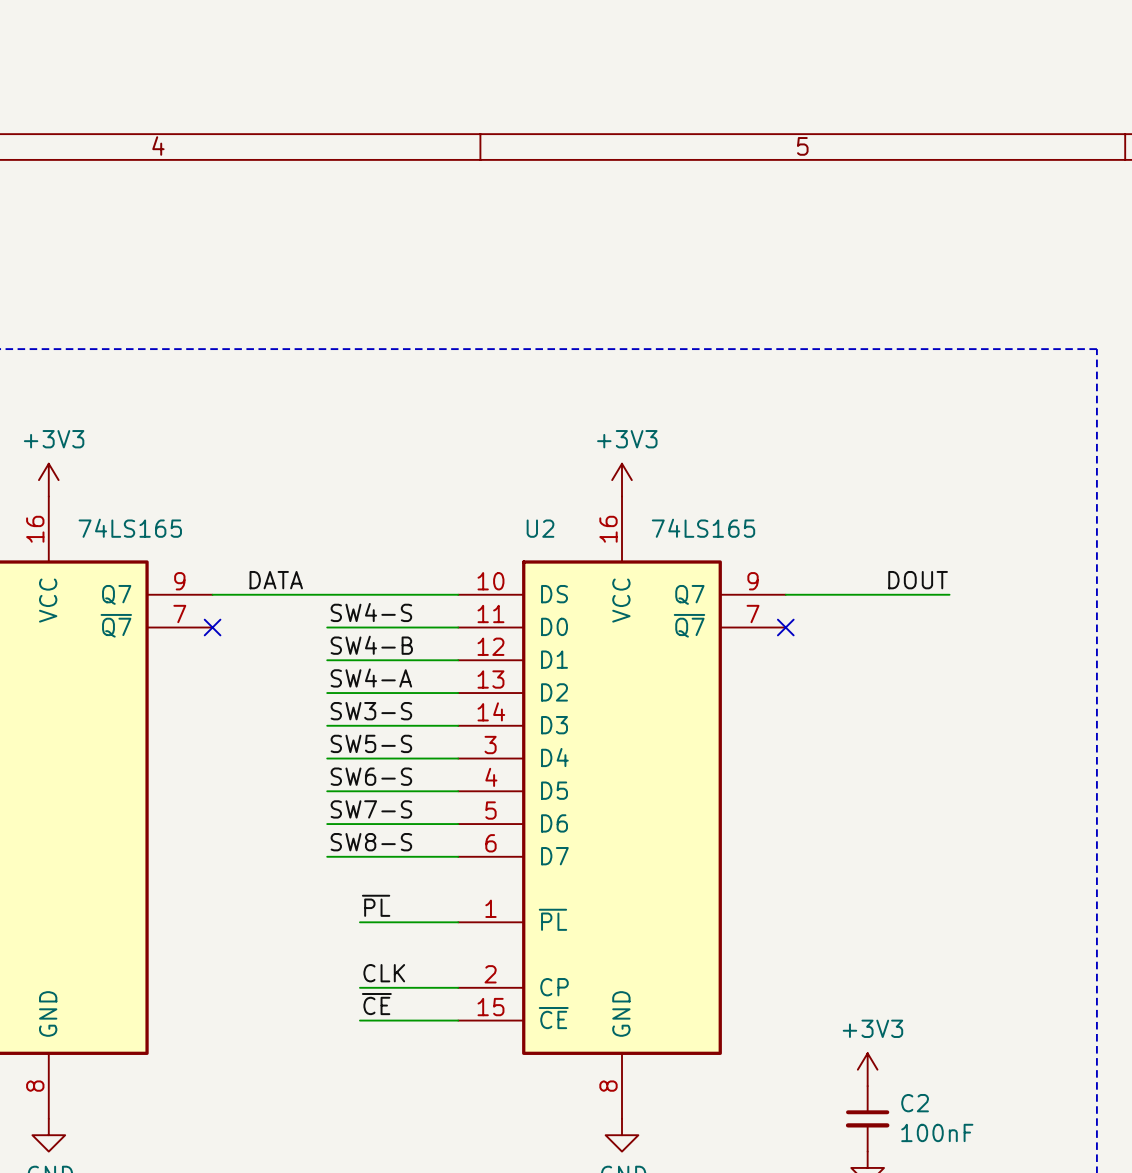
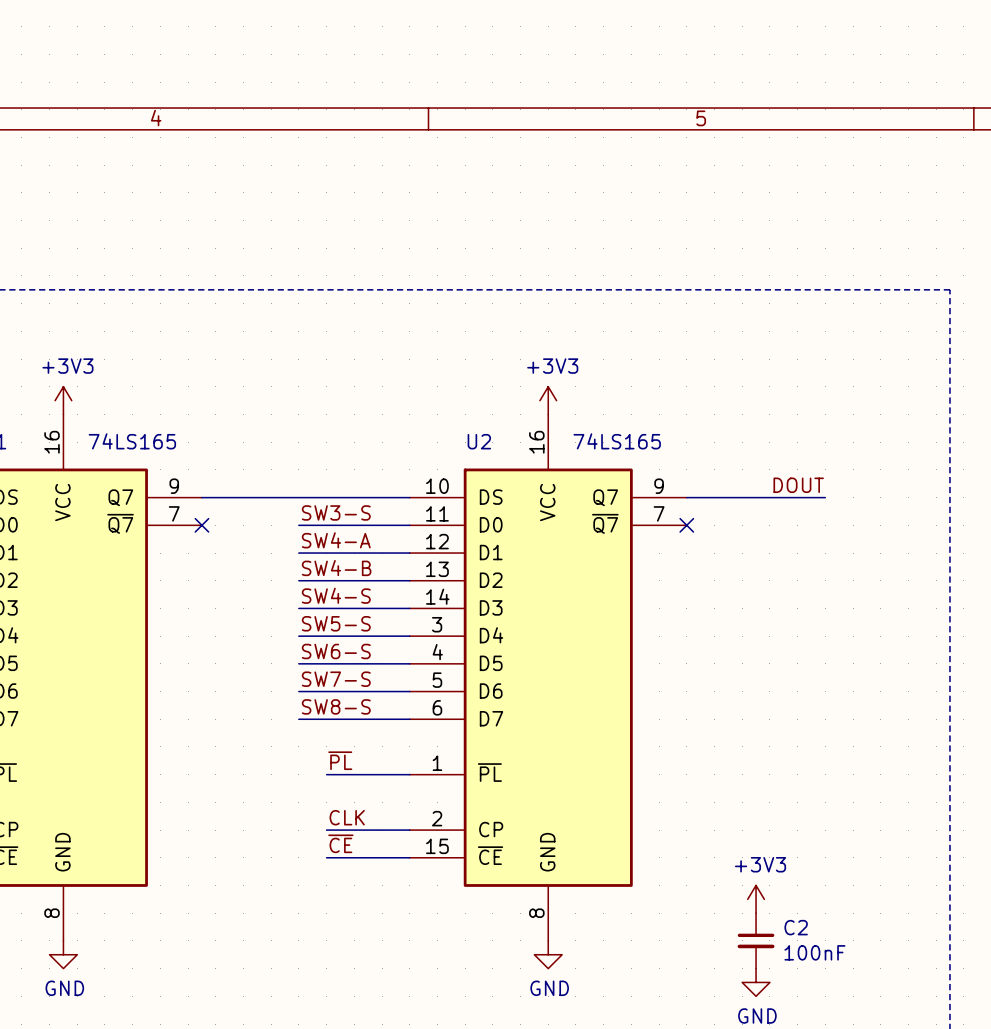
label: DATA (276, 580) -> none
label: SW4-S (371, 612) -> SW3-S (336, 512)
label: SW4-B (371, 645) -> SW4-A (336, 540)
label: SW4-A (371, 678) -> SW4-B (336, 568)
label: SW3-S (371, 711) -> SW4-S (336, 595)

